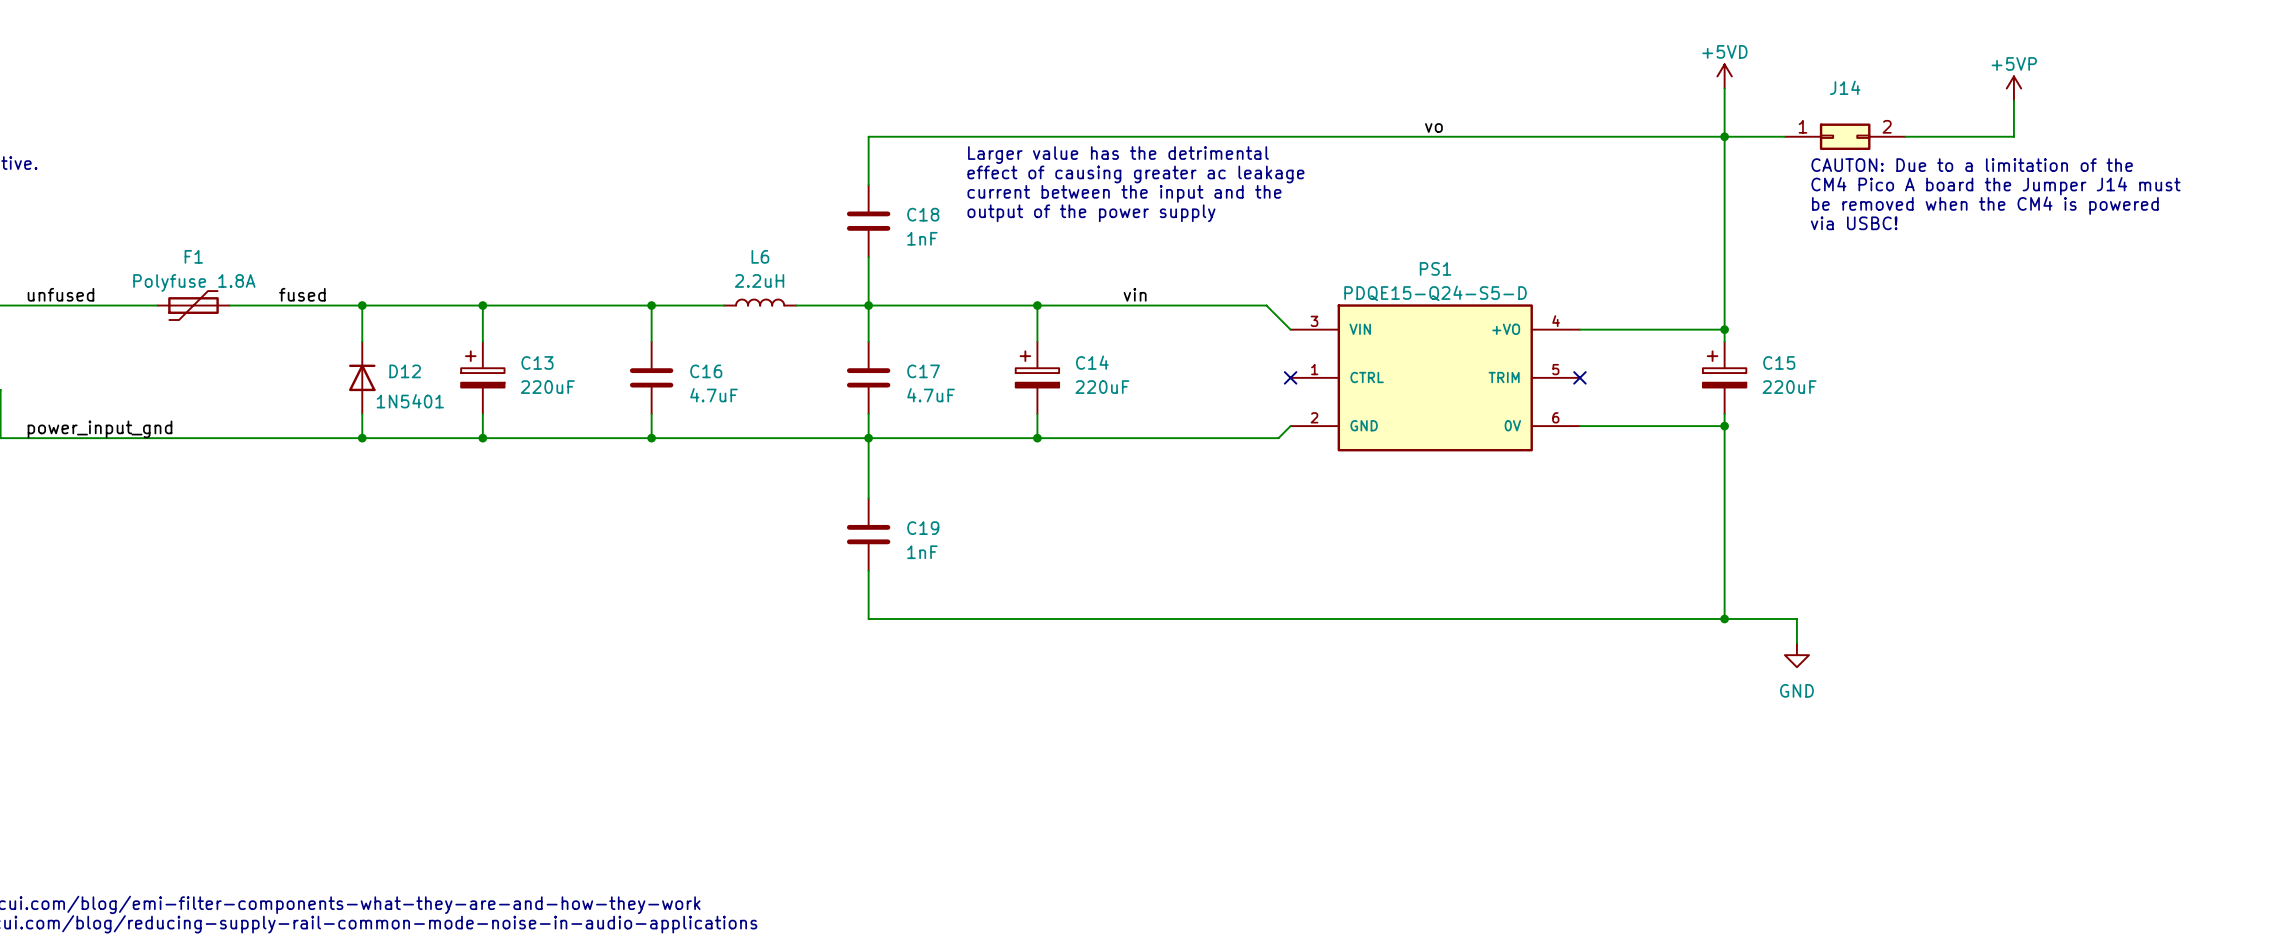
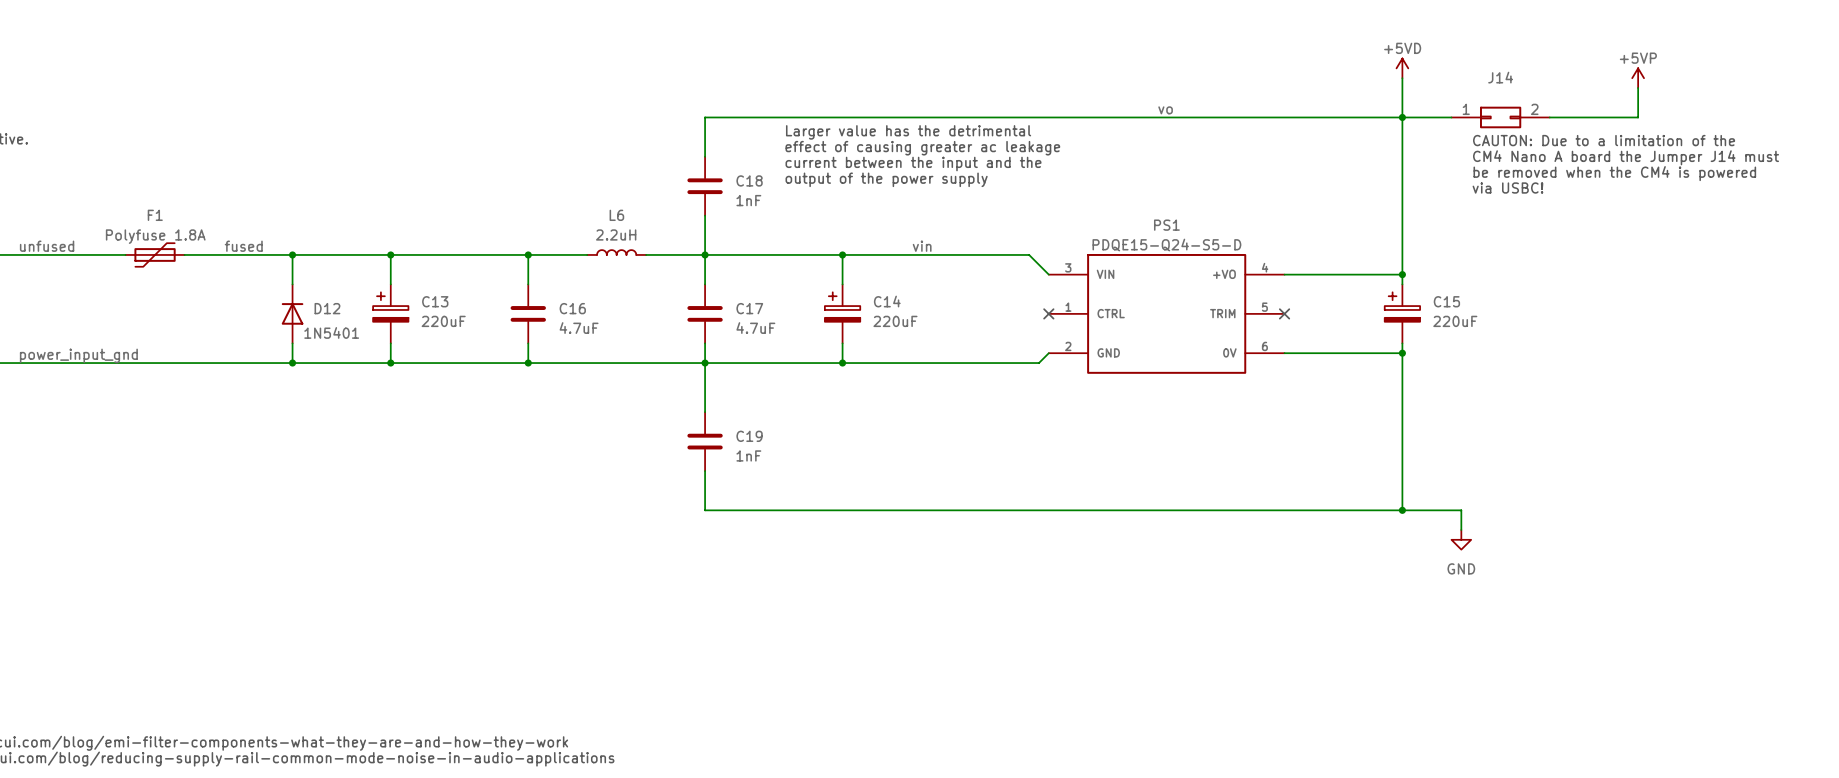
text: CM4 Pico A board the Jumper J14 must (1995, 186) -> CM4 Nano A board the Jumper J14 must (1626, 157)

